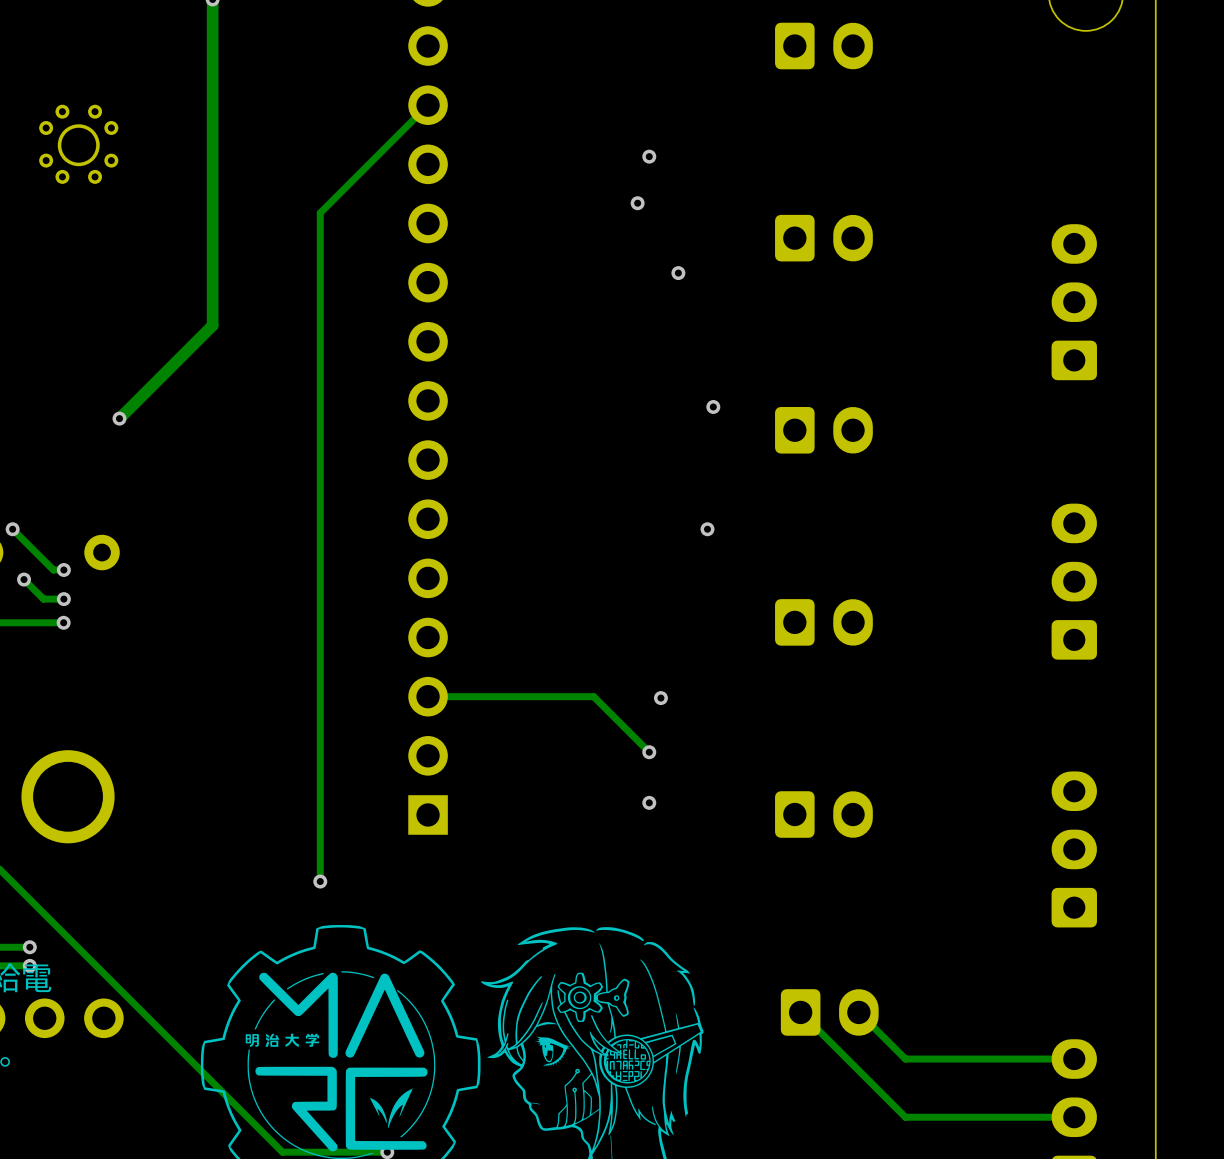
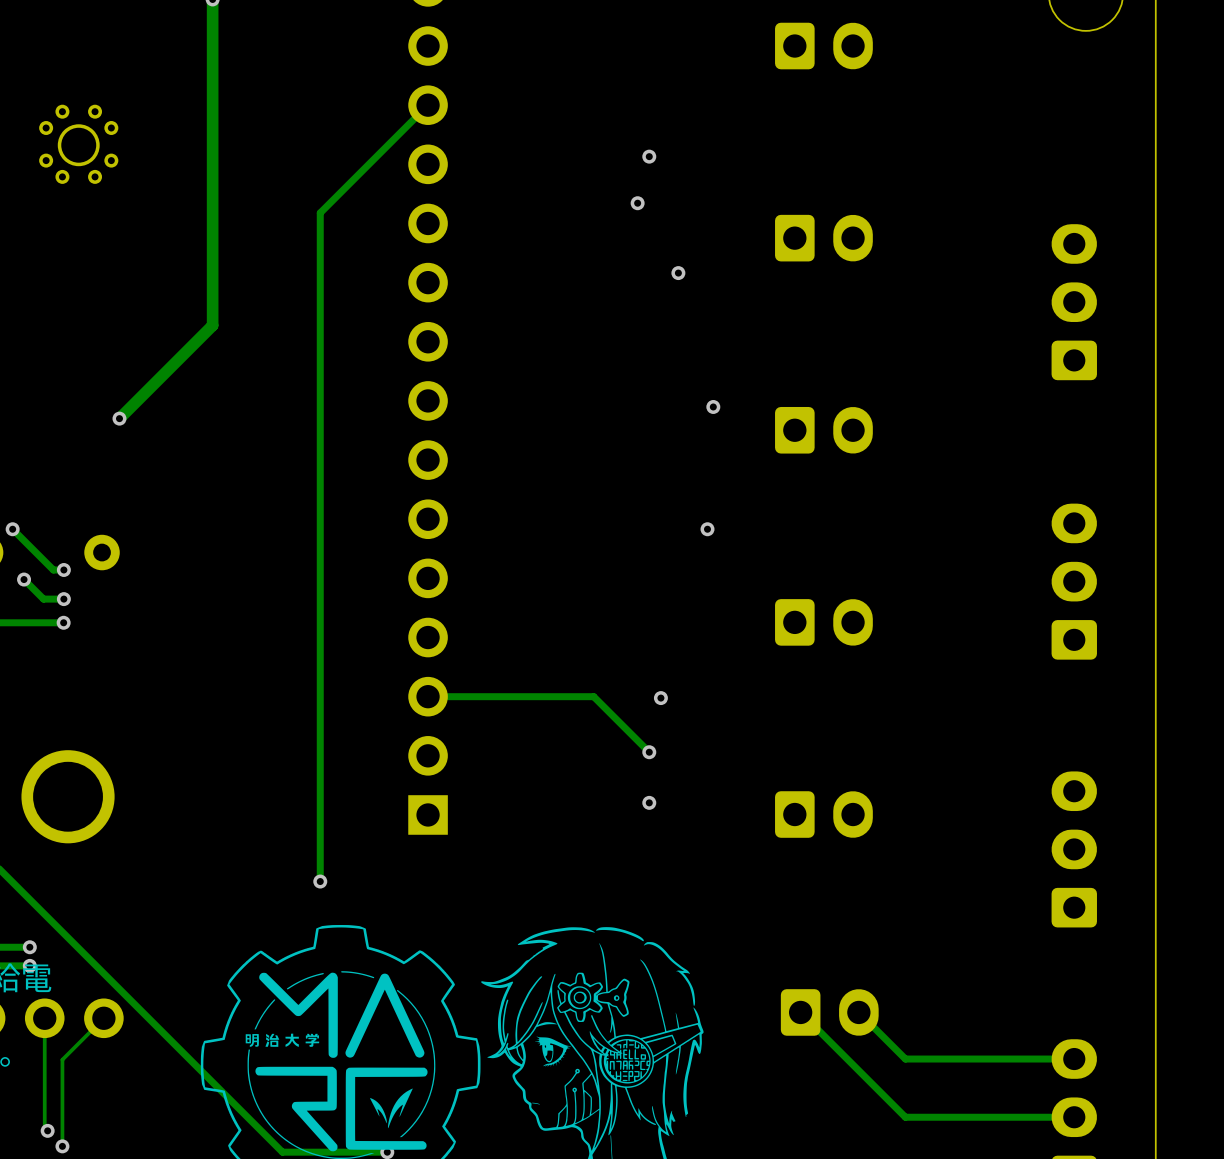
track: none -> (44, 1018) (44, 1127) (47, 1130)
track: none -> (103, 1018) (62, 1059) (62, 1146)
via: none -> (47, 1130)
via: none -> (62, 1146)

